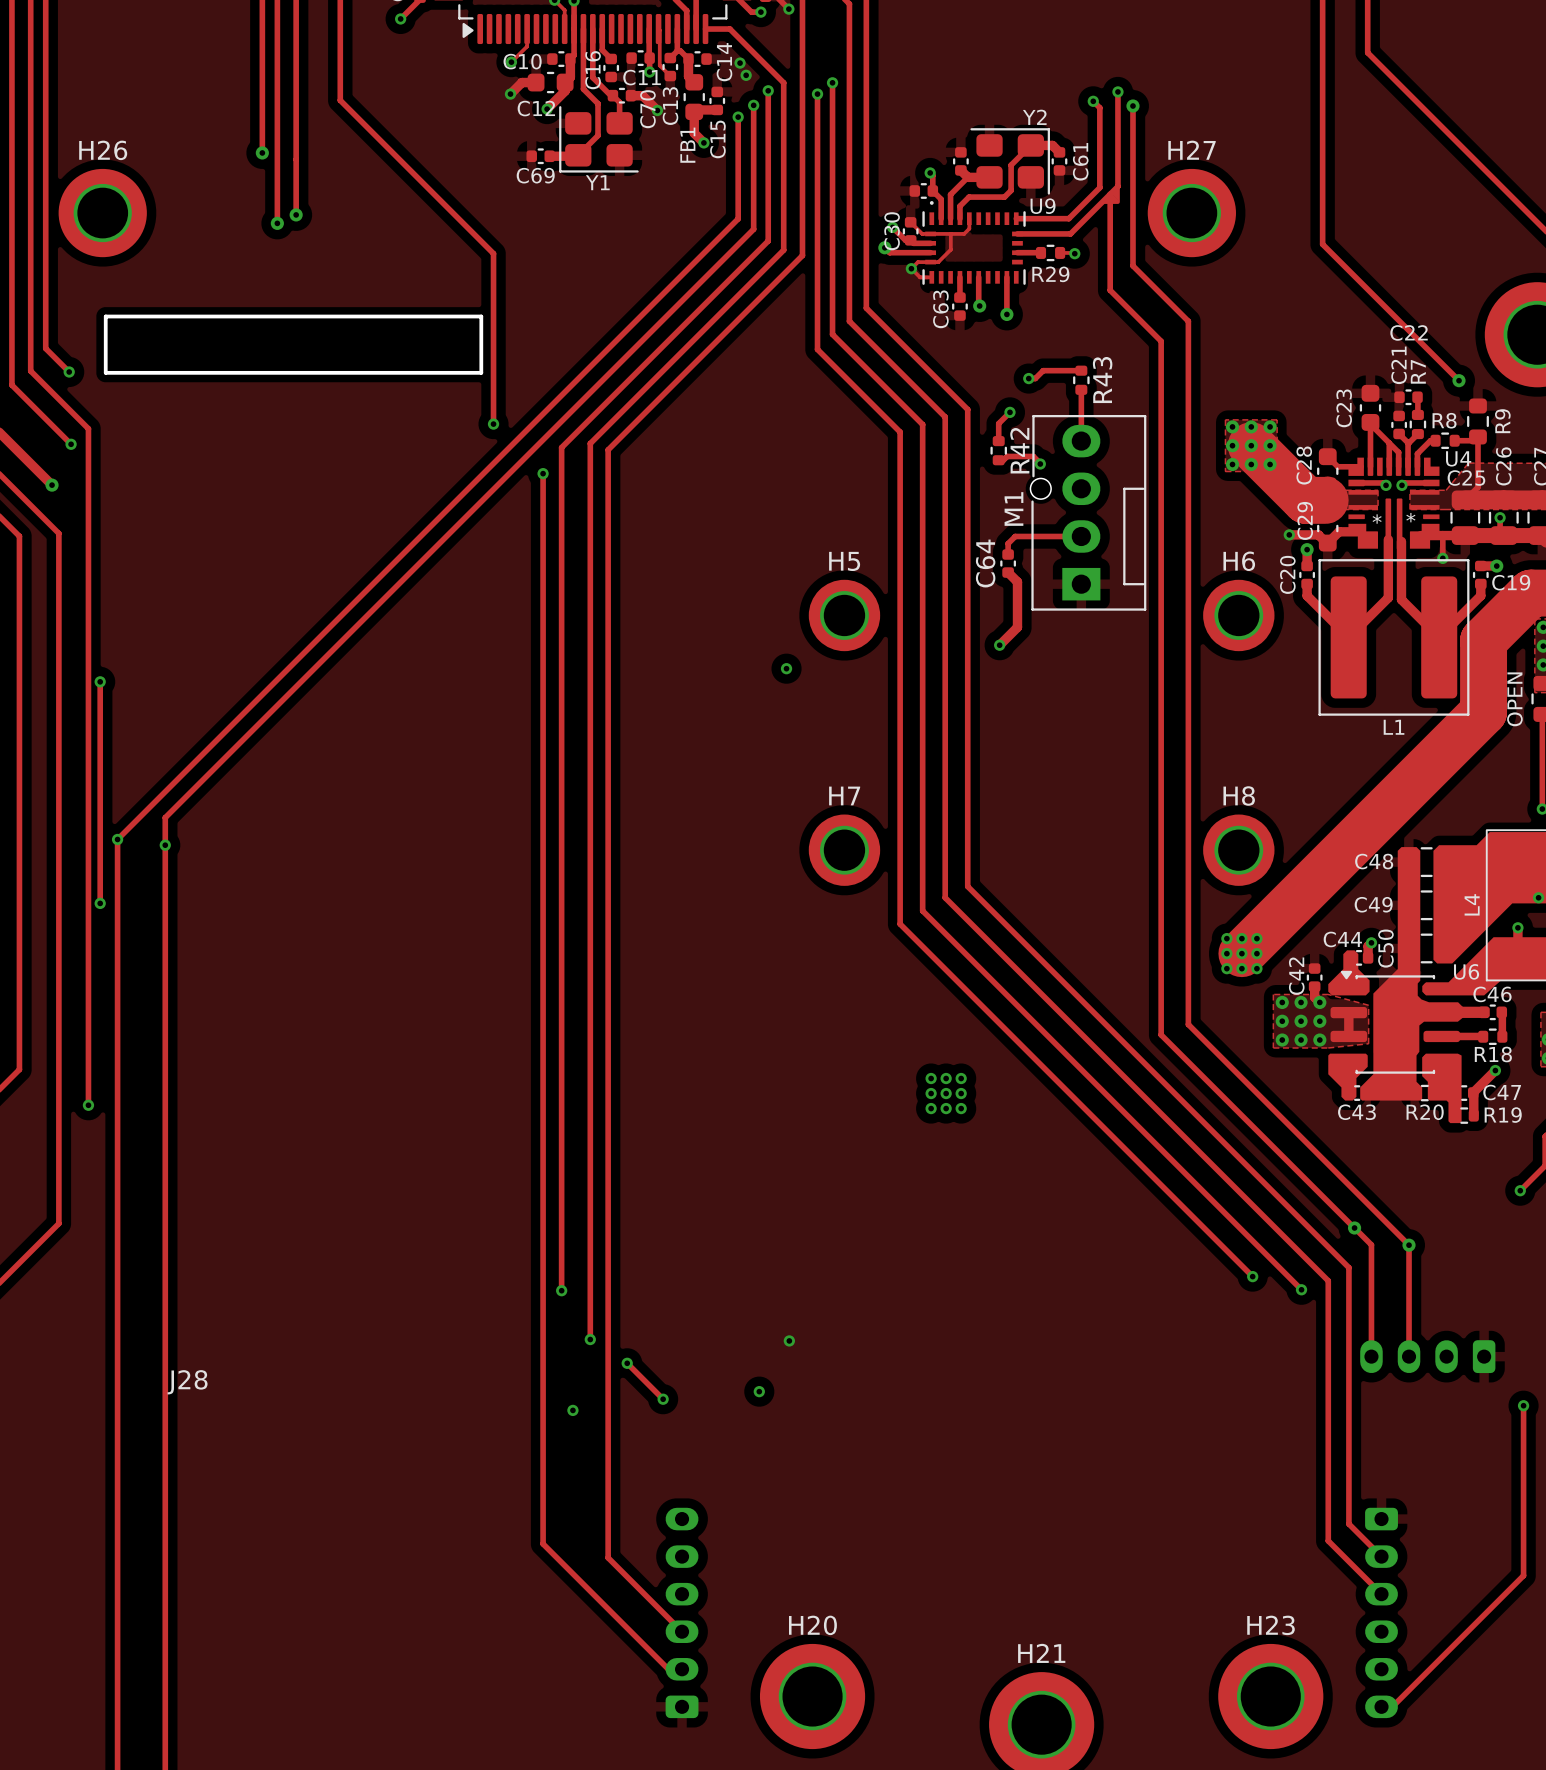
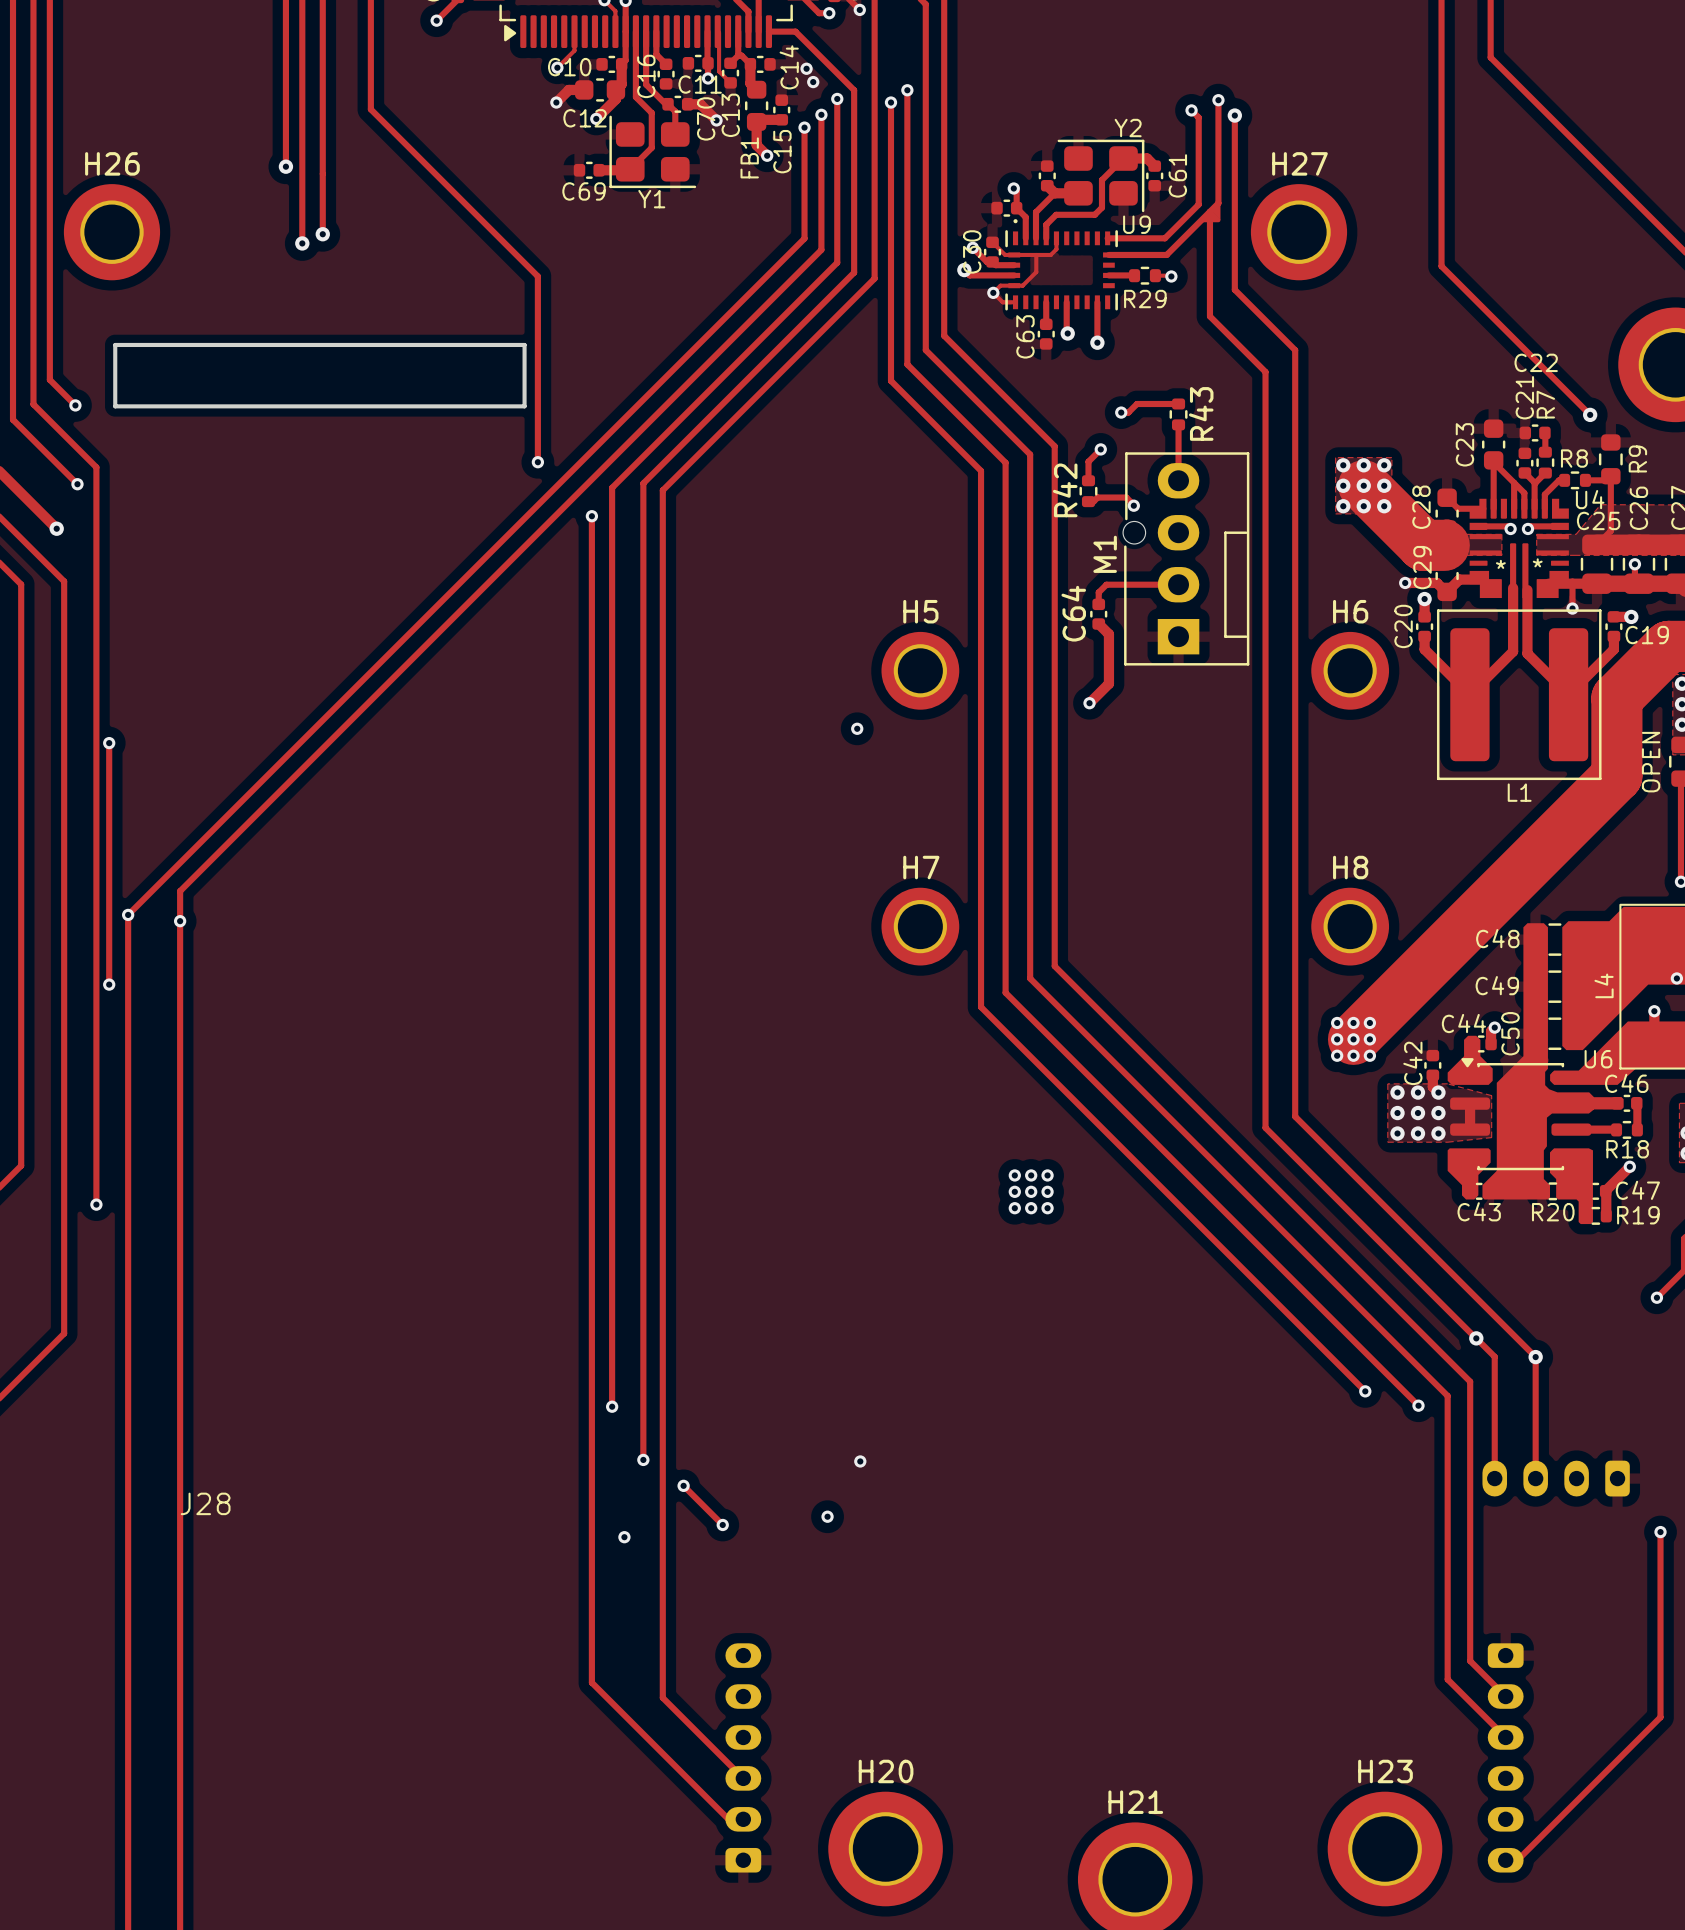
R42 name position: R42 (1019, 450) -> R42 (1065, 490)

